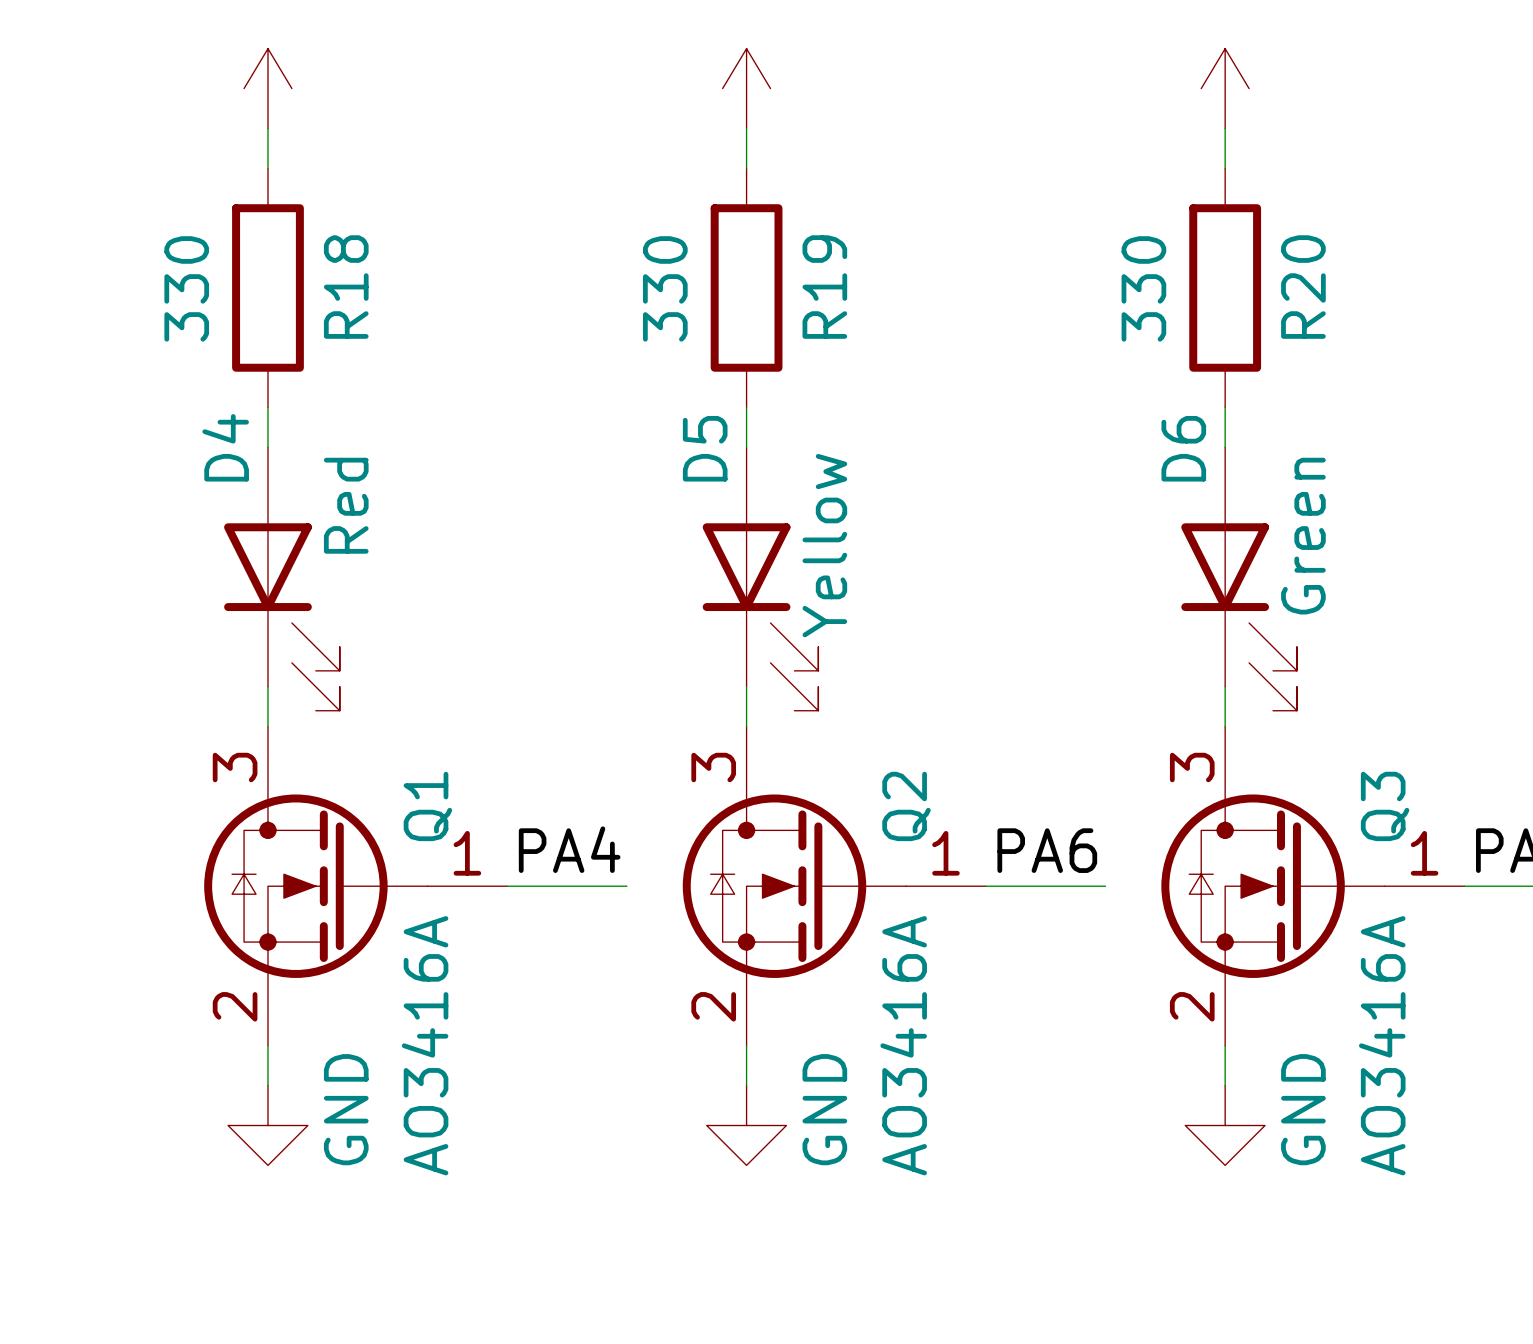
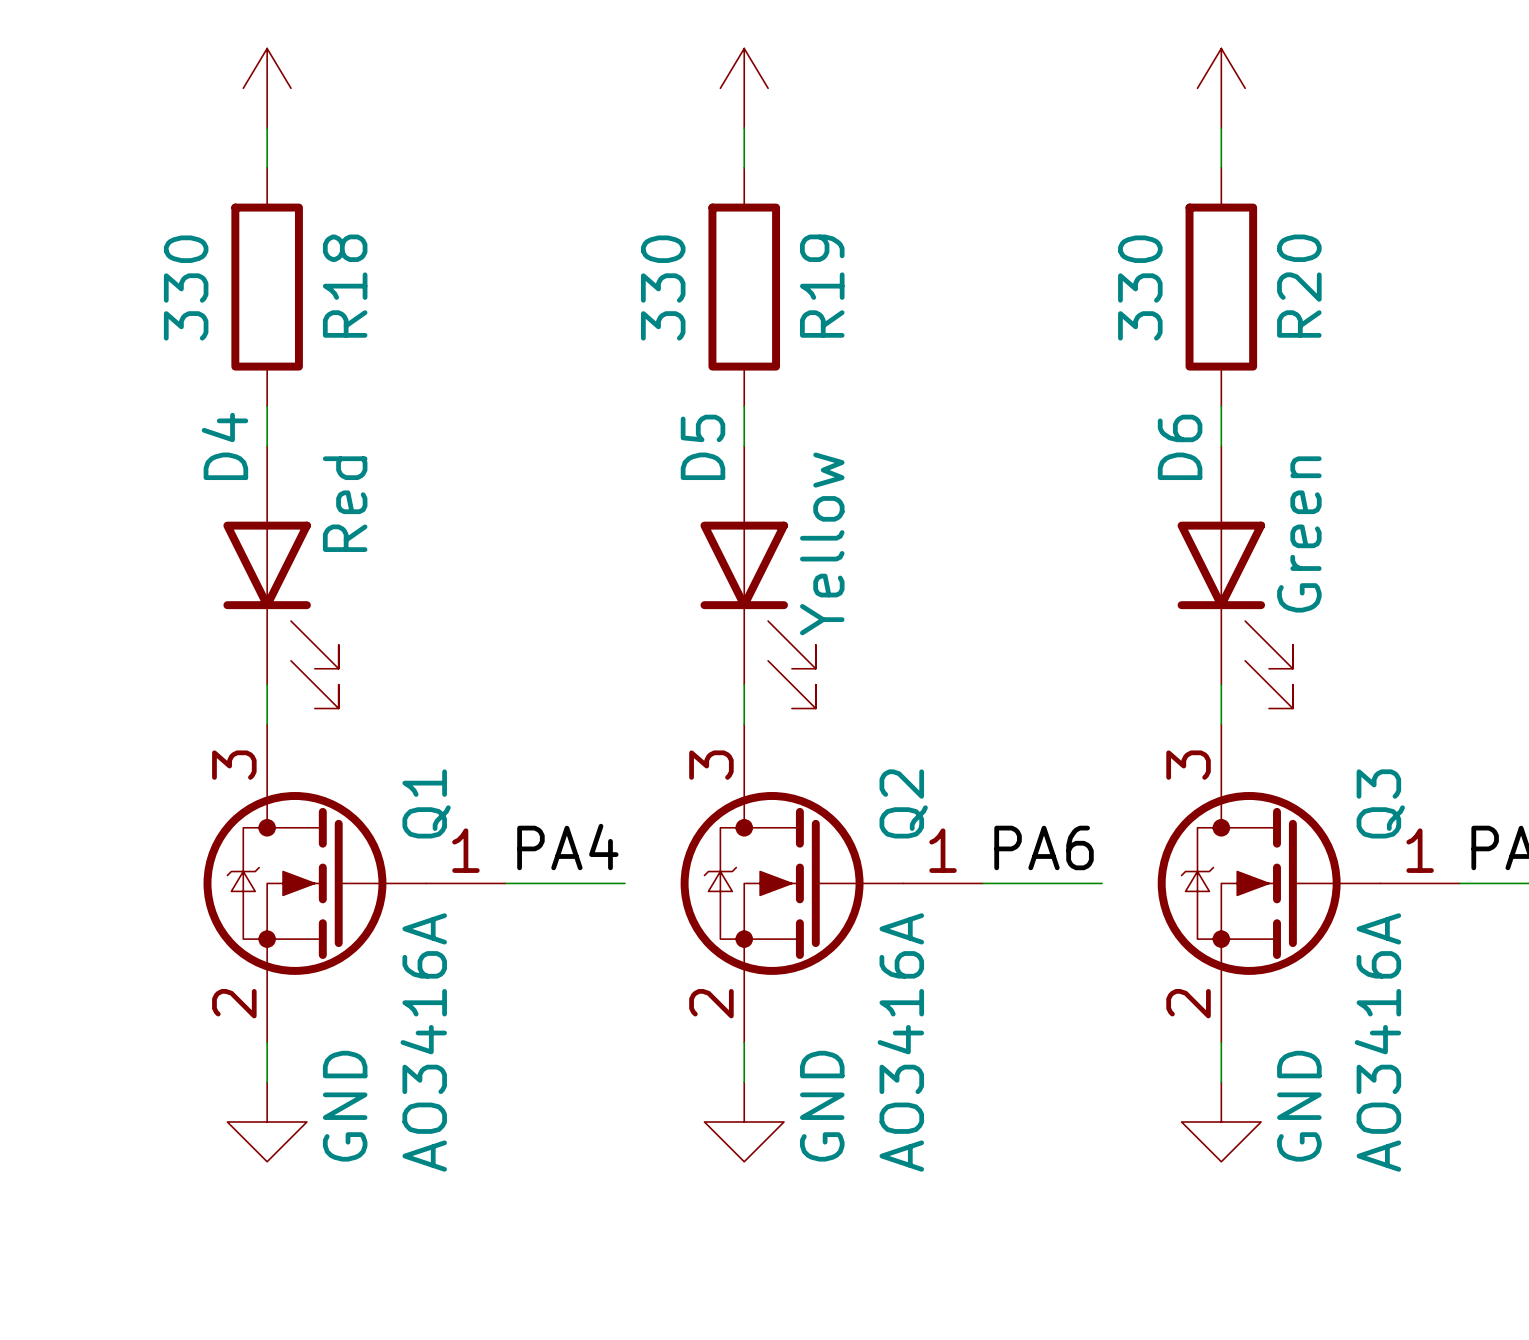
Q1 symbol: [204, 726, 508, 1046] -> [203, 724, 506, 1043]
Q2 symbol: [682, 726, 986, 1046] -> [680, 724, 983, 1043]
Q3 symbol: [1161, 726, 1465, 1046] -> [1157, 724, 1460, 1043]

